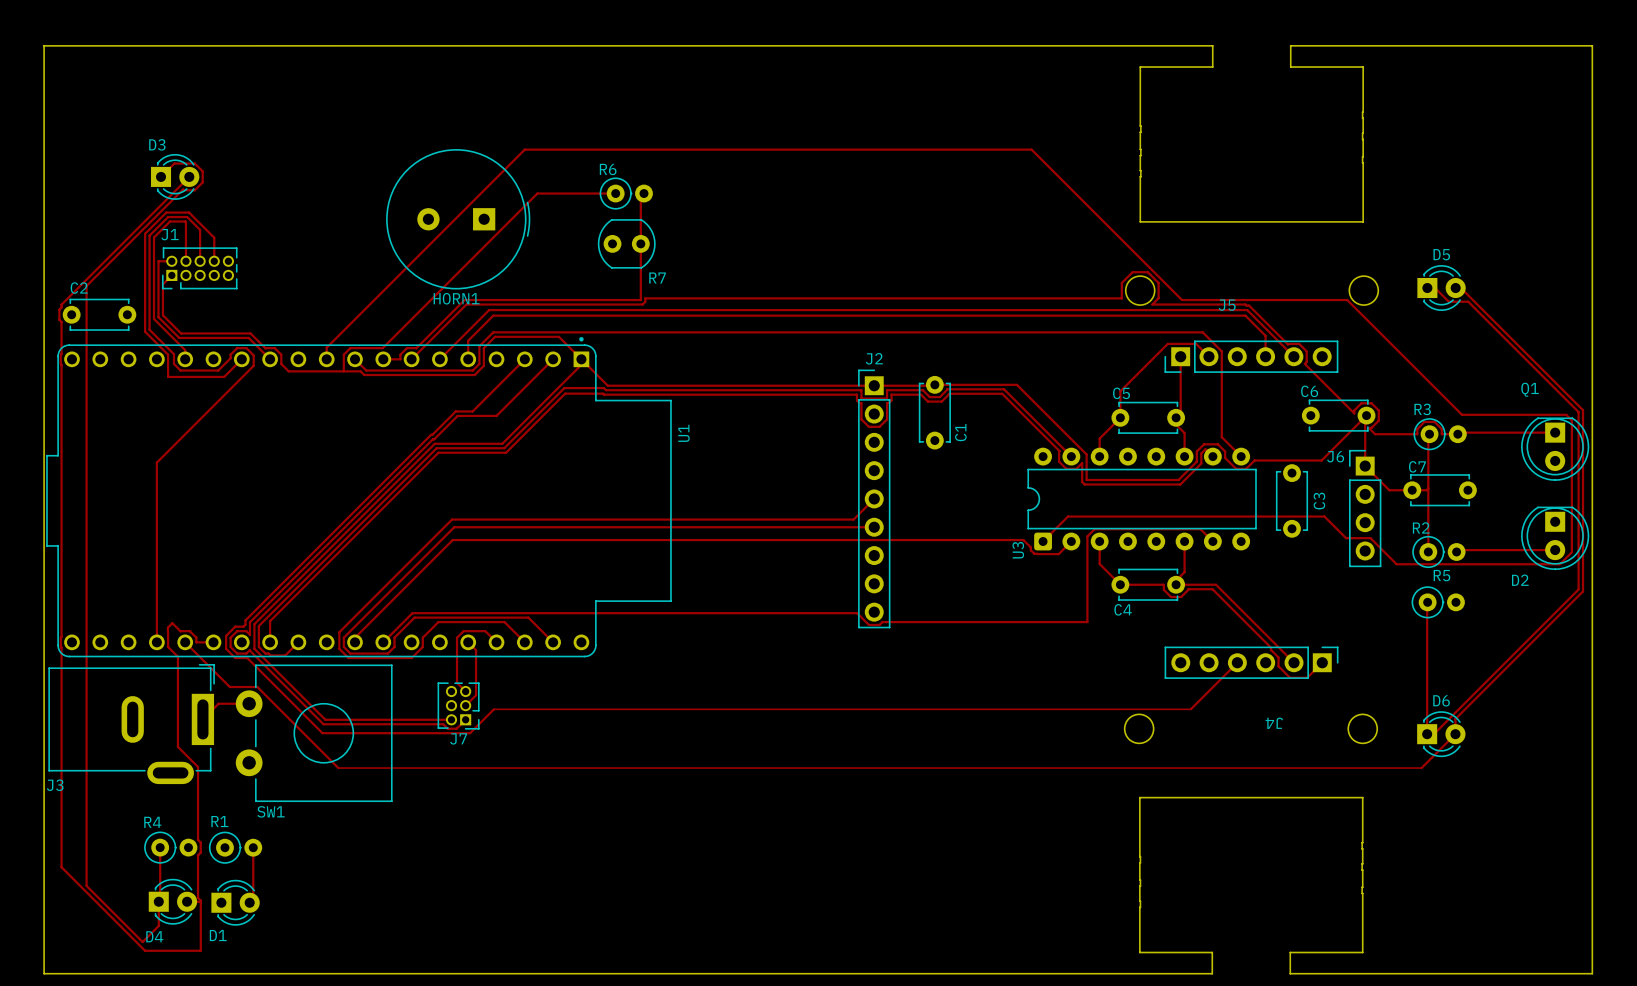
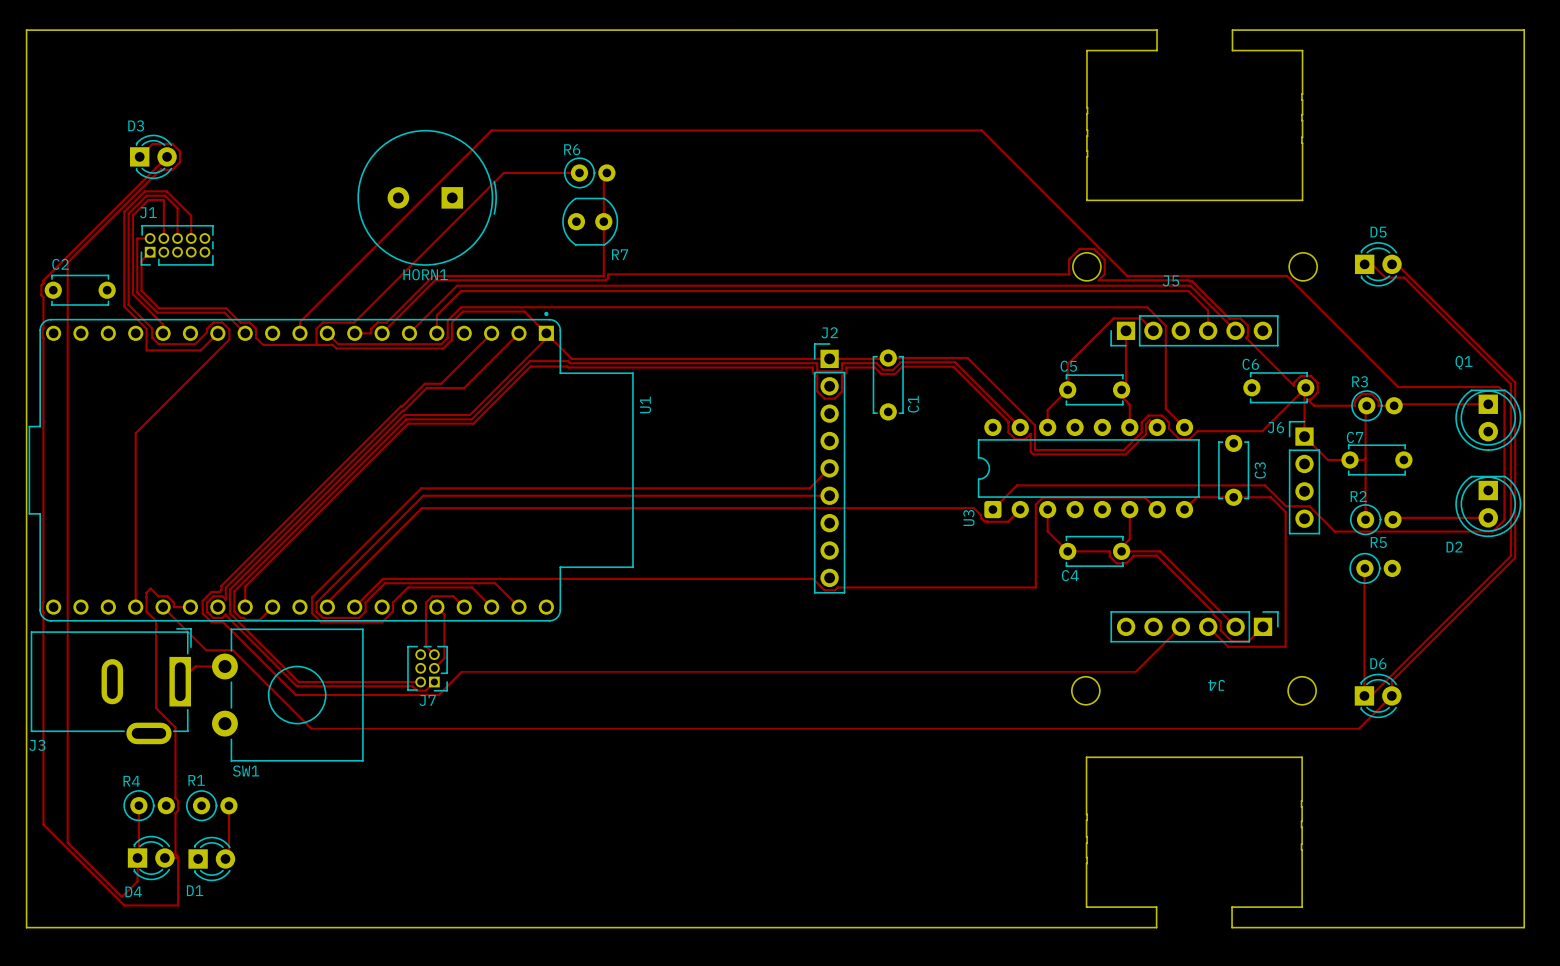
track: none -> (1184, 509) (1196, 497) (1270, 497) (1285, 512) (1285, 646) (1228, 646) (1208, 626)

